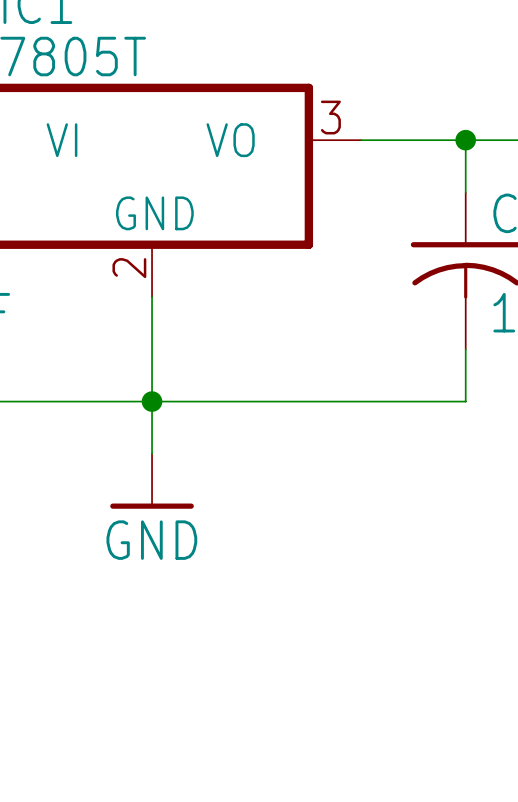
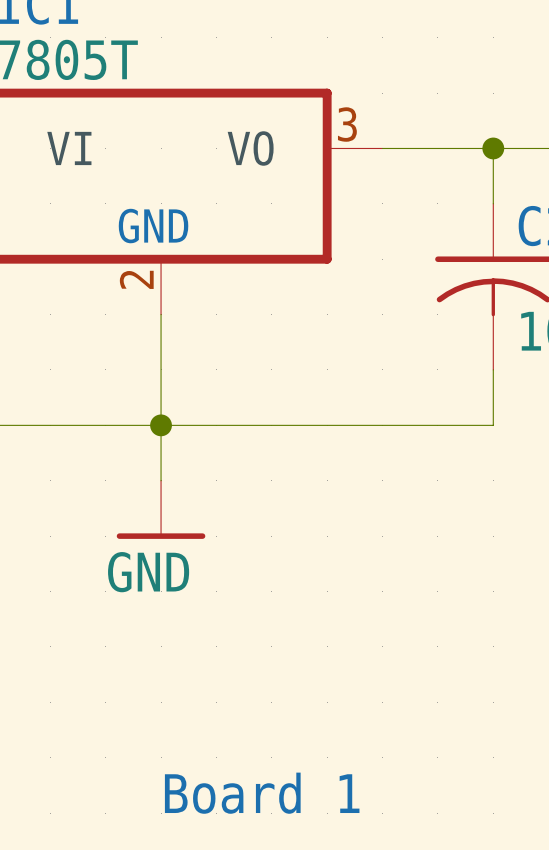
text: none -> Board 1 (262, 793)

